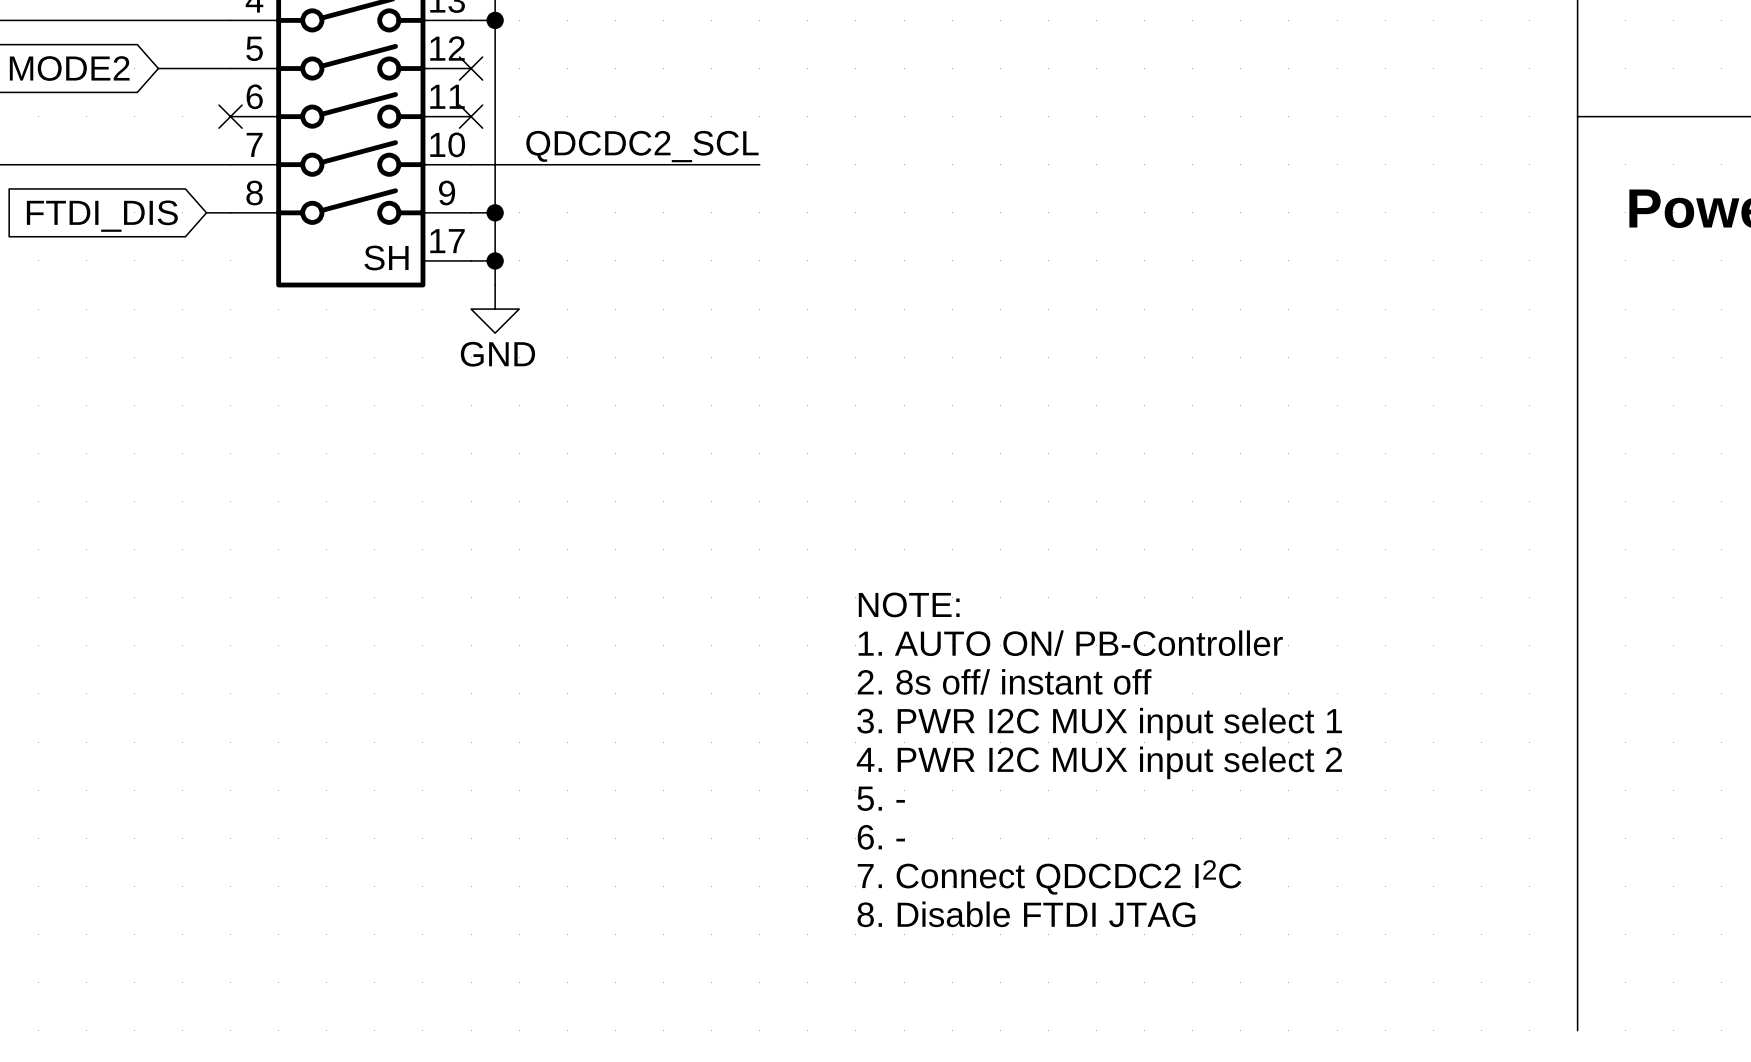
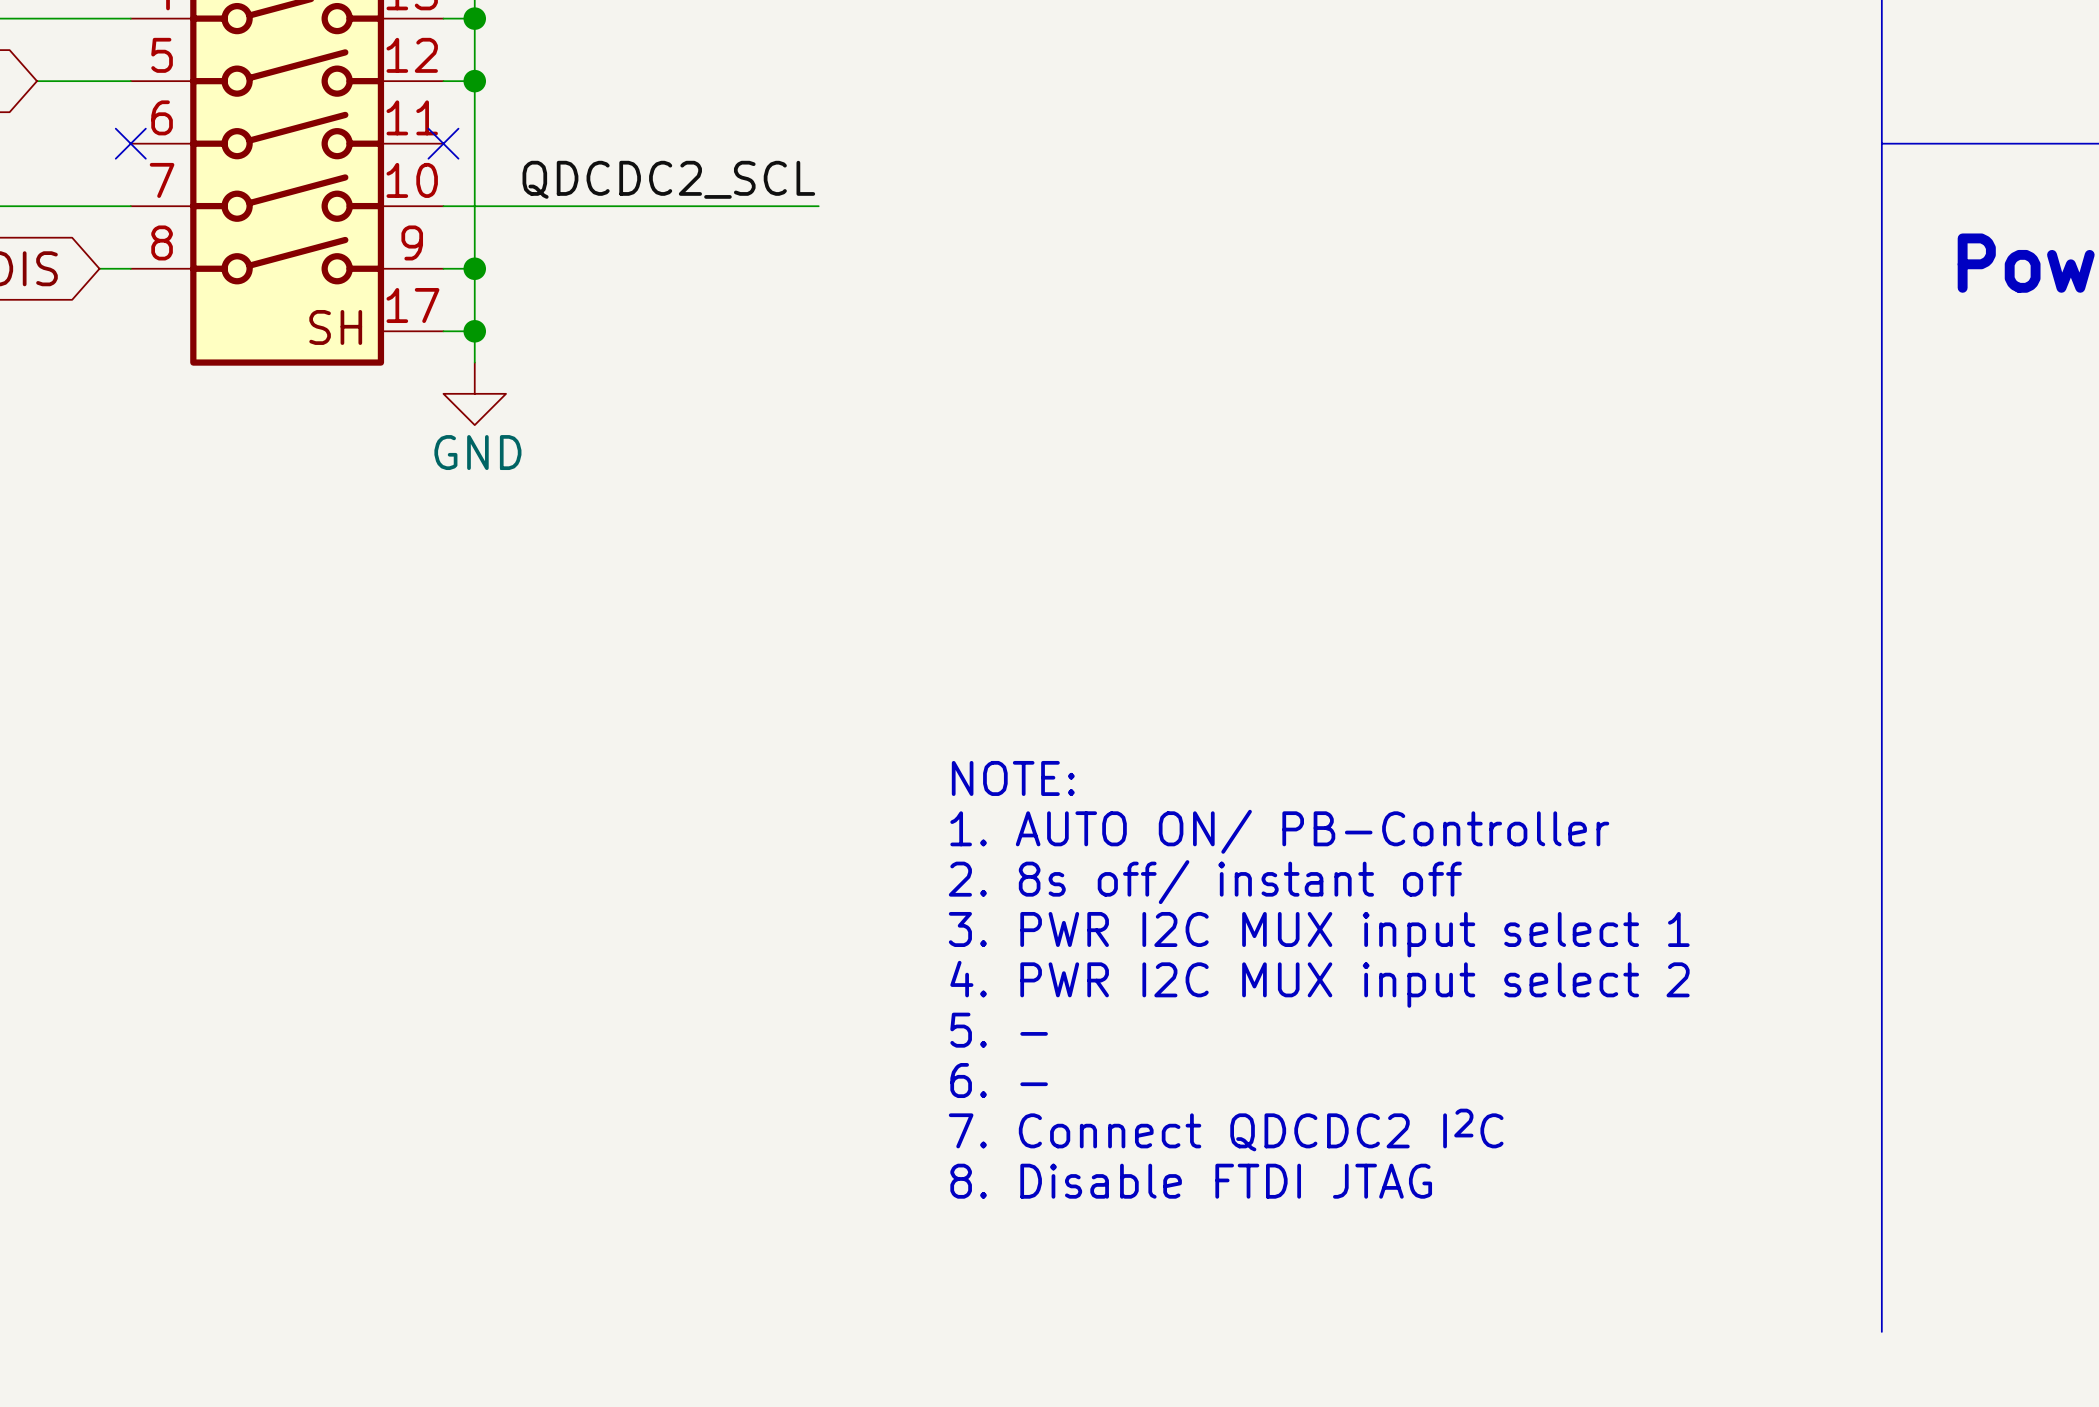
wire: none -> (443, 81) (474, 81)
no-connect mark: (471, 68) -> none
junction: none -> (474, 81)

